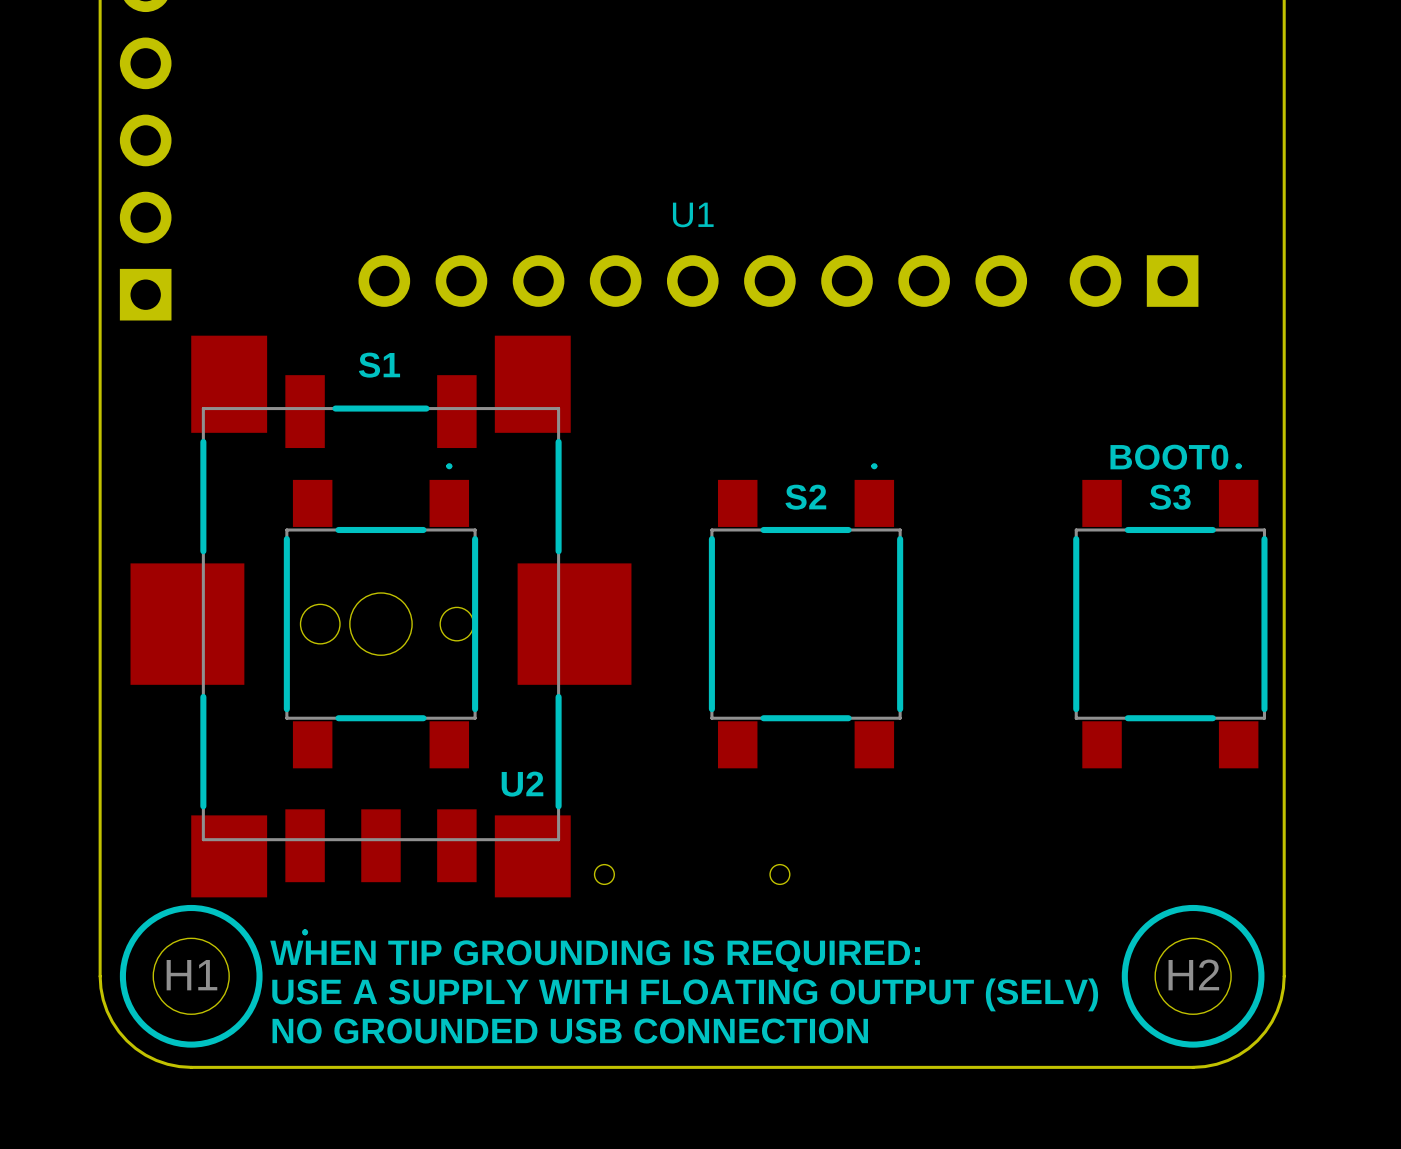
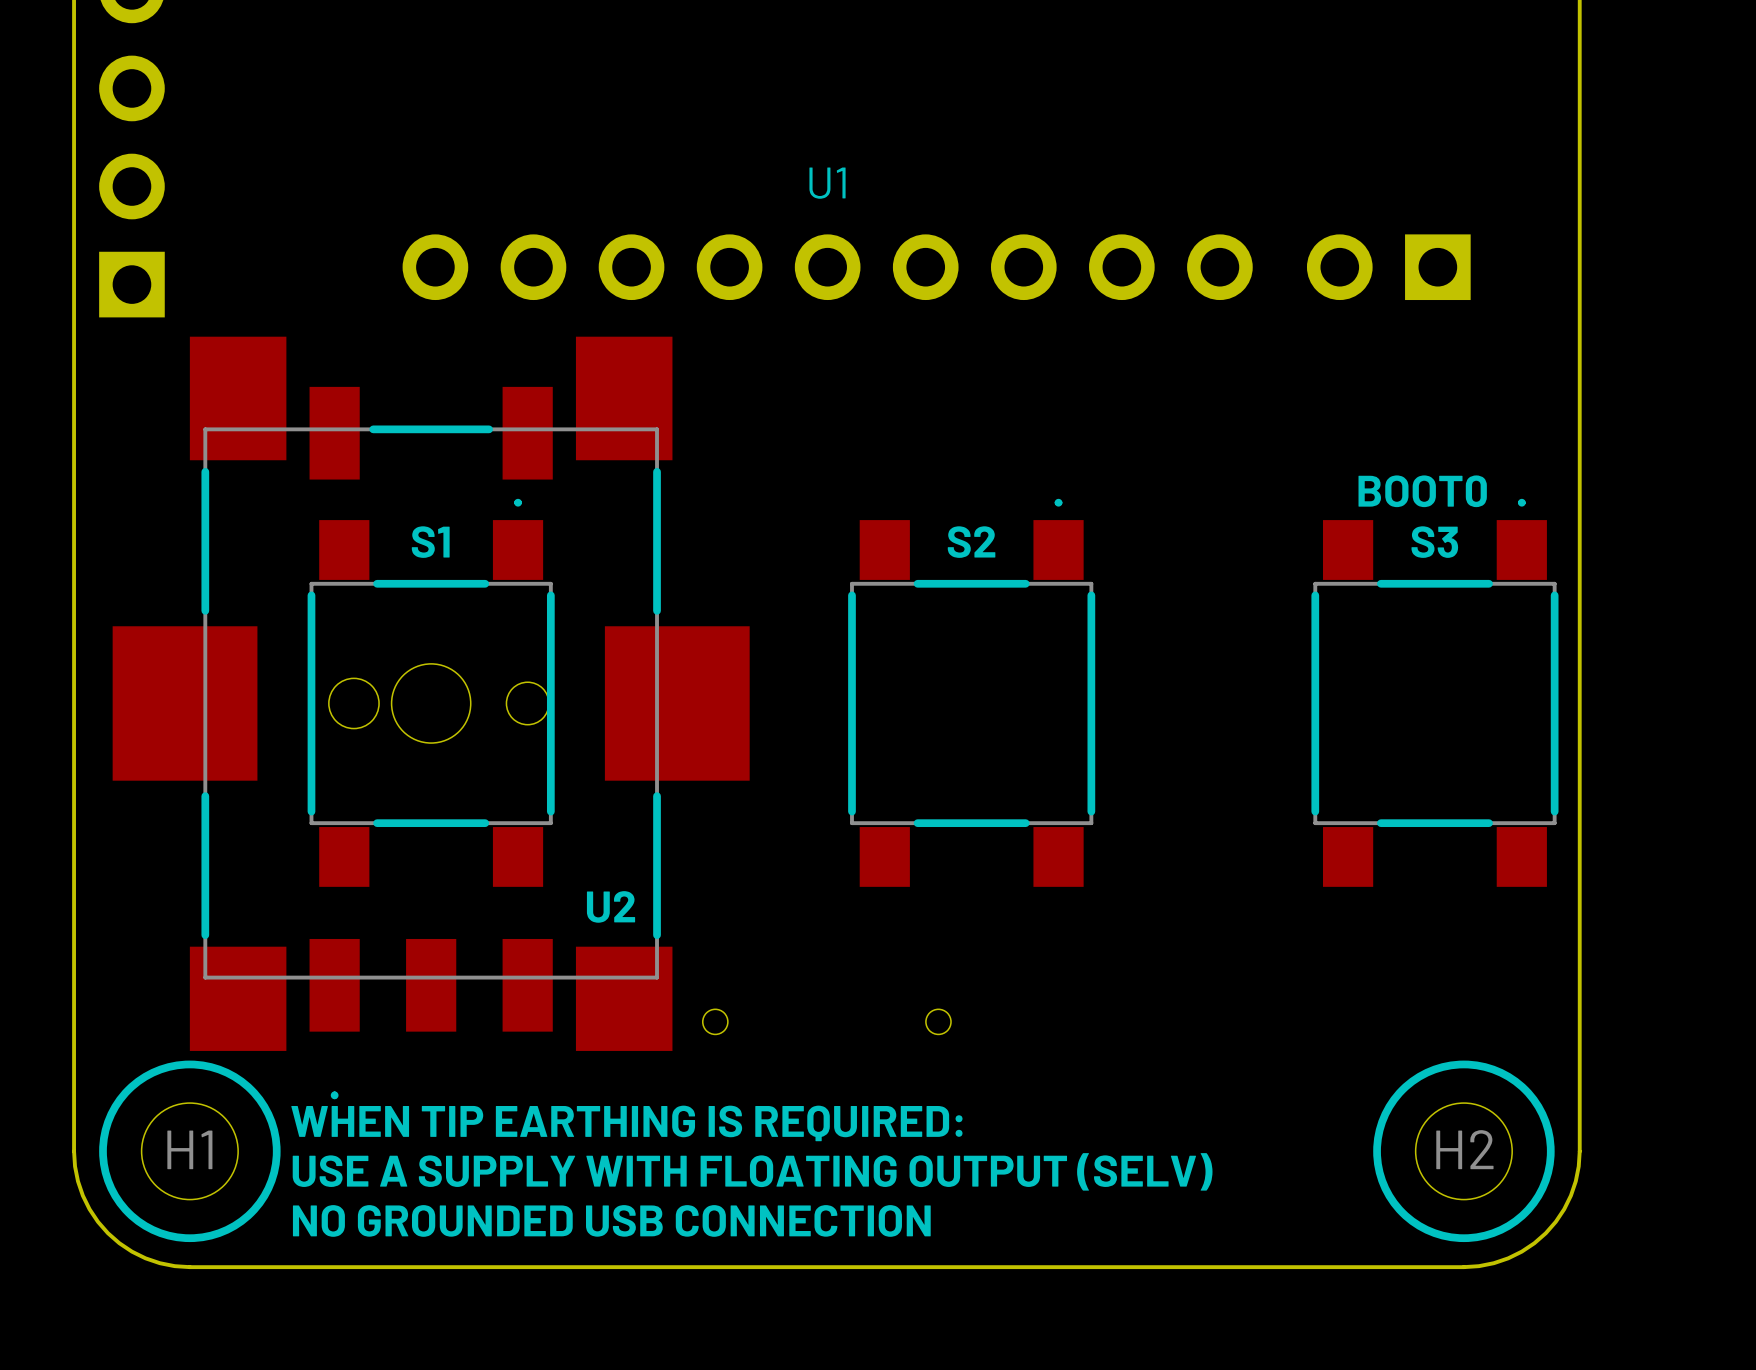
S1 name position: S1 (379, 365) -> S1 (430, 542)
text: WHEN TIP GROUNDING IS REQUIRED: (595, 956) -> WHEN TIP EARTHING IS REQUIRED: (626, 1123)

